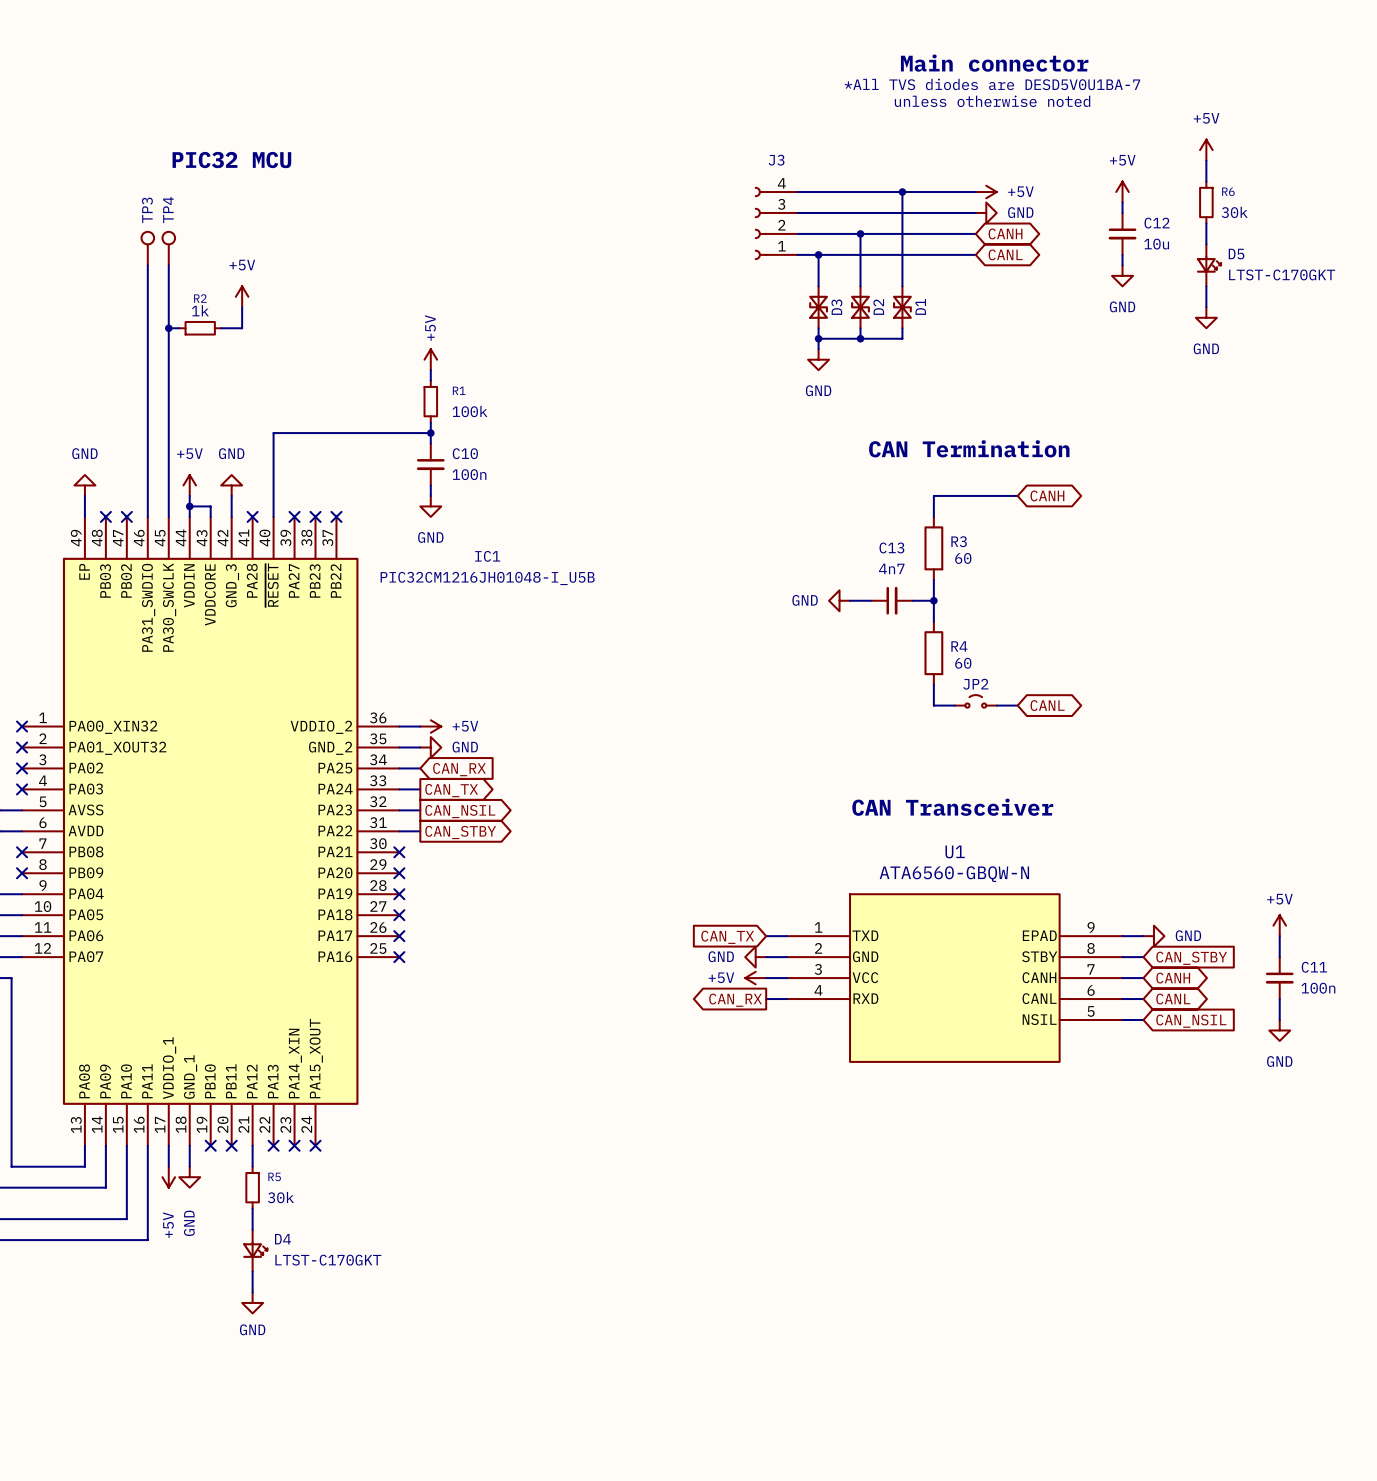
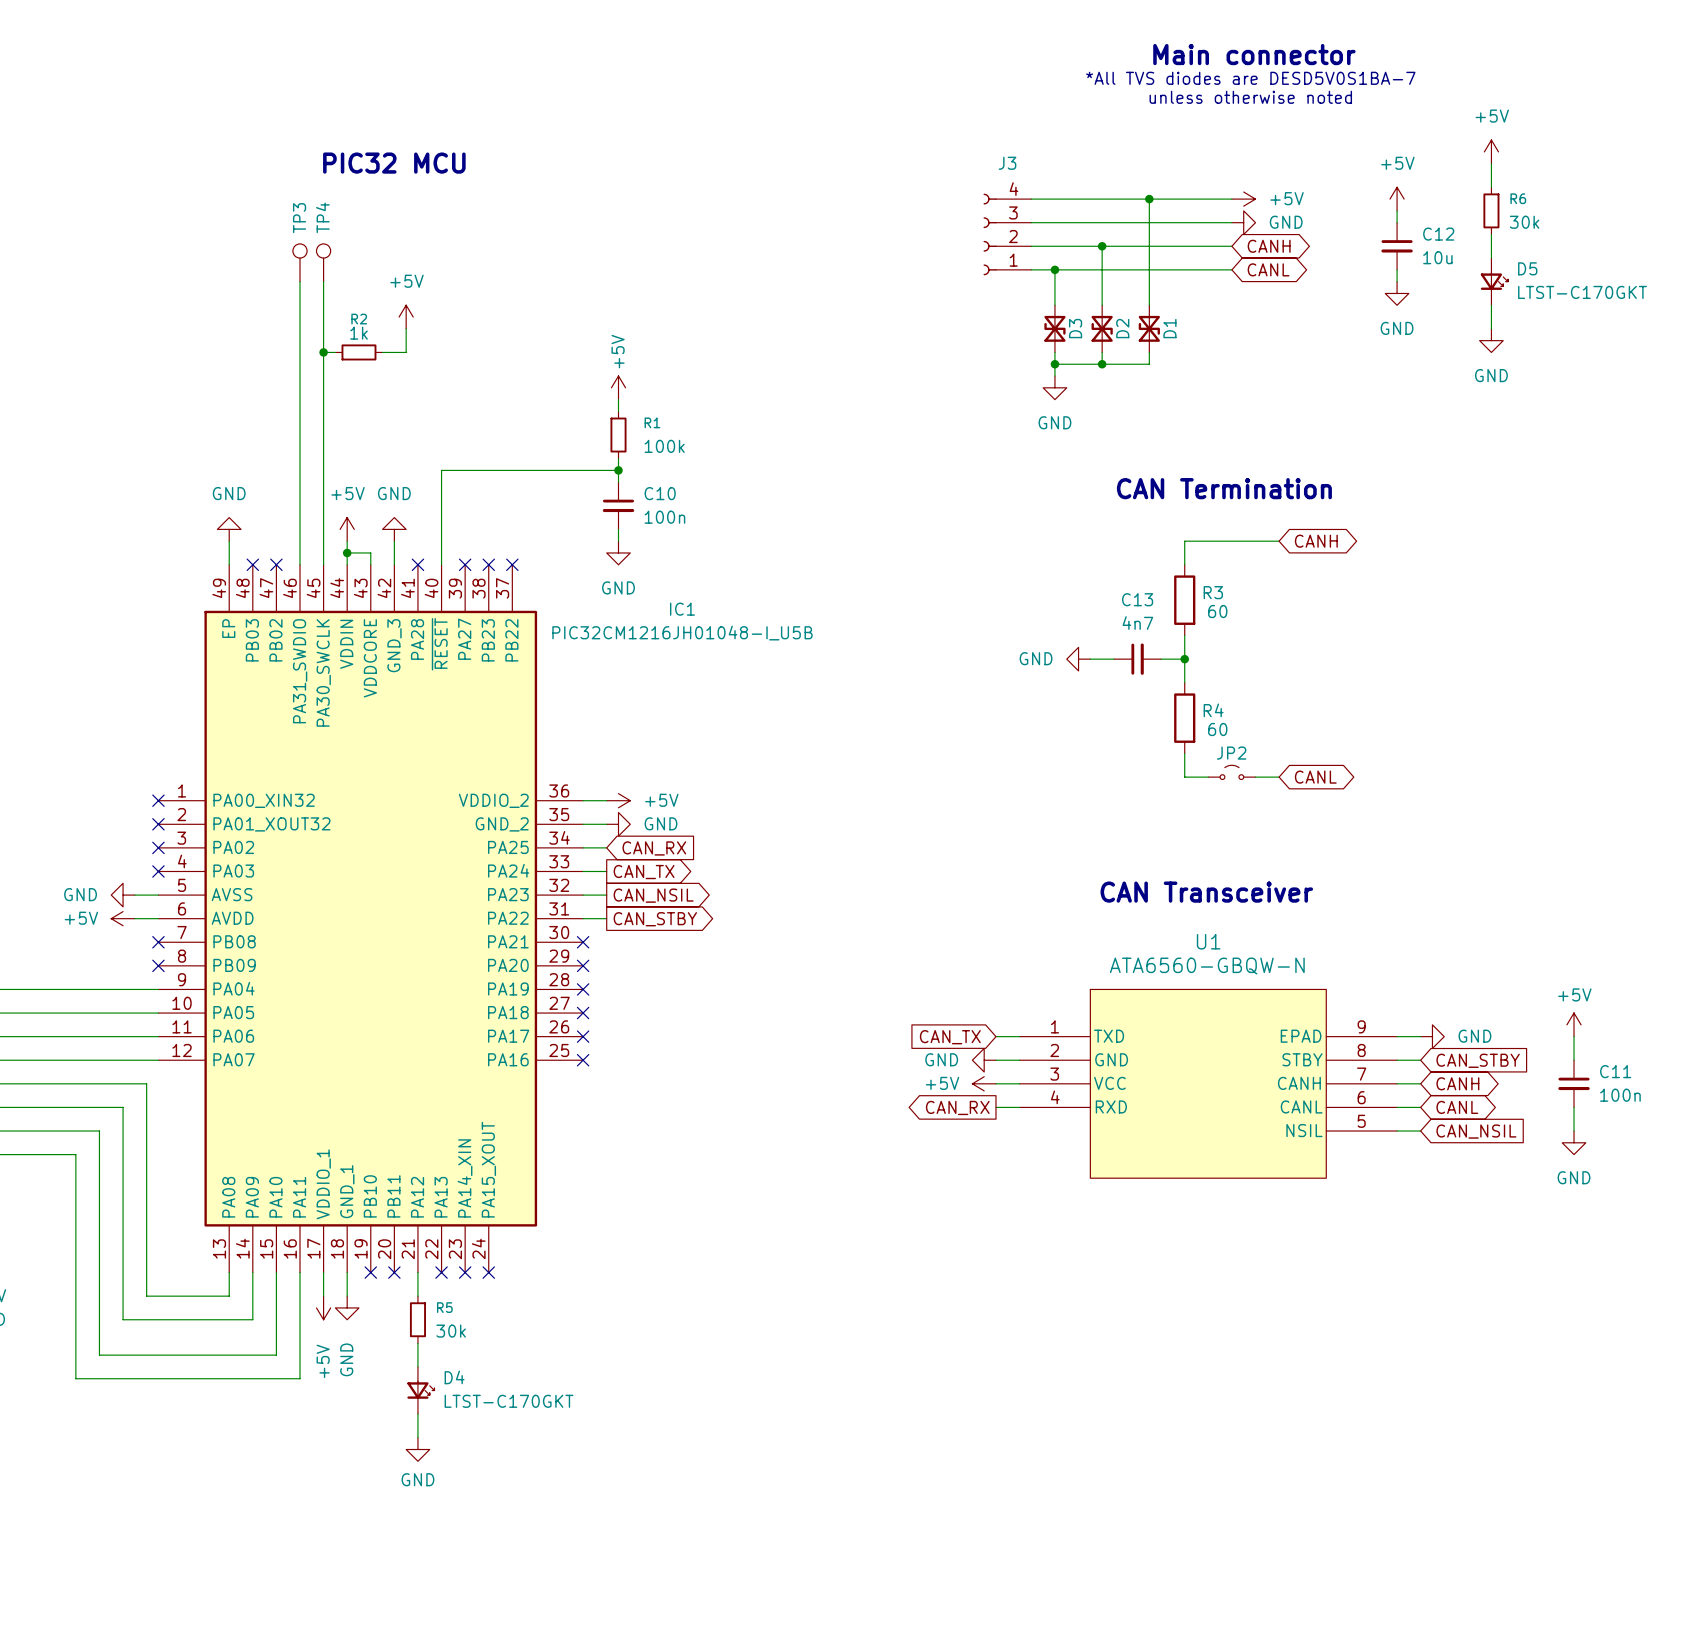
text: *All TVS diodes are DESD5V0U1BA-7 (992, 84) -> *All TVS diodes are DESD5V0S1BA-7 (1250, 78)

